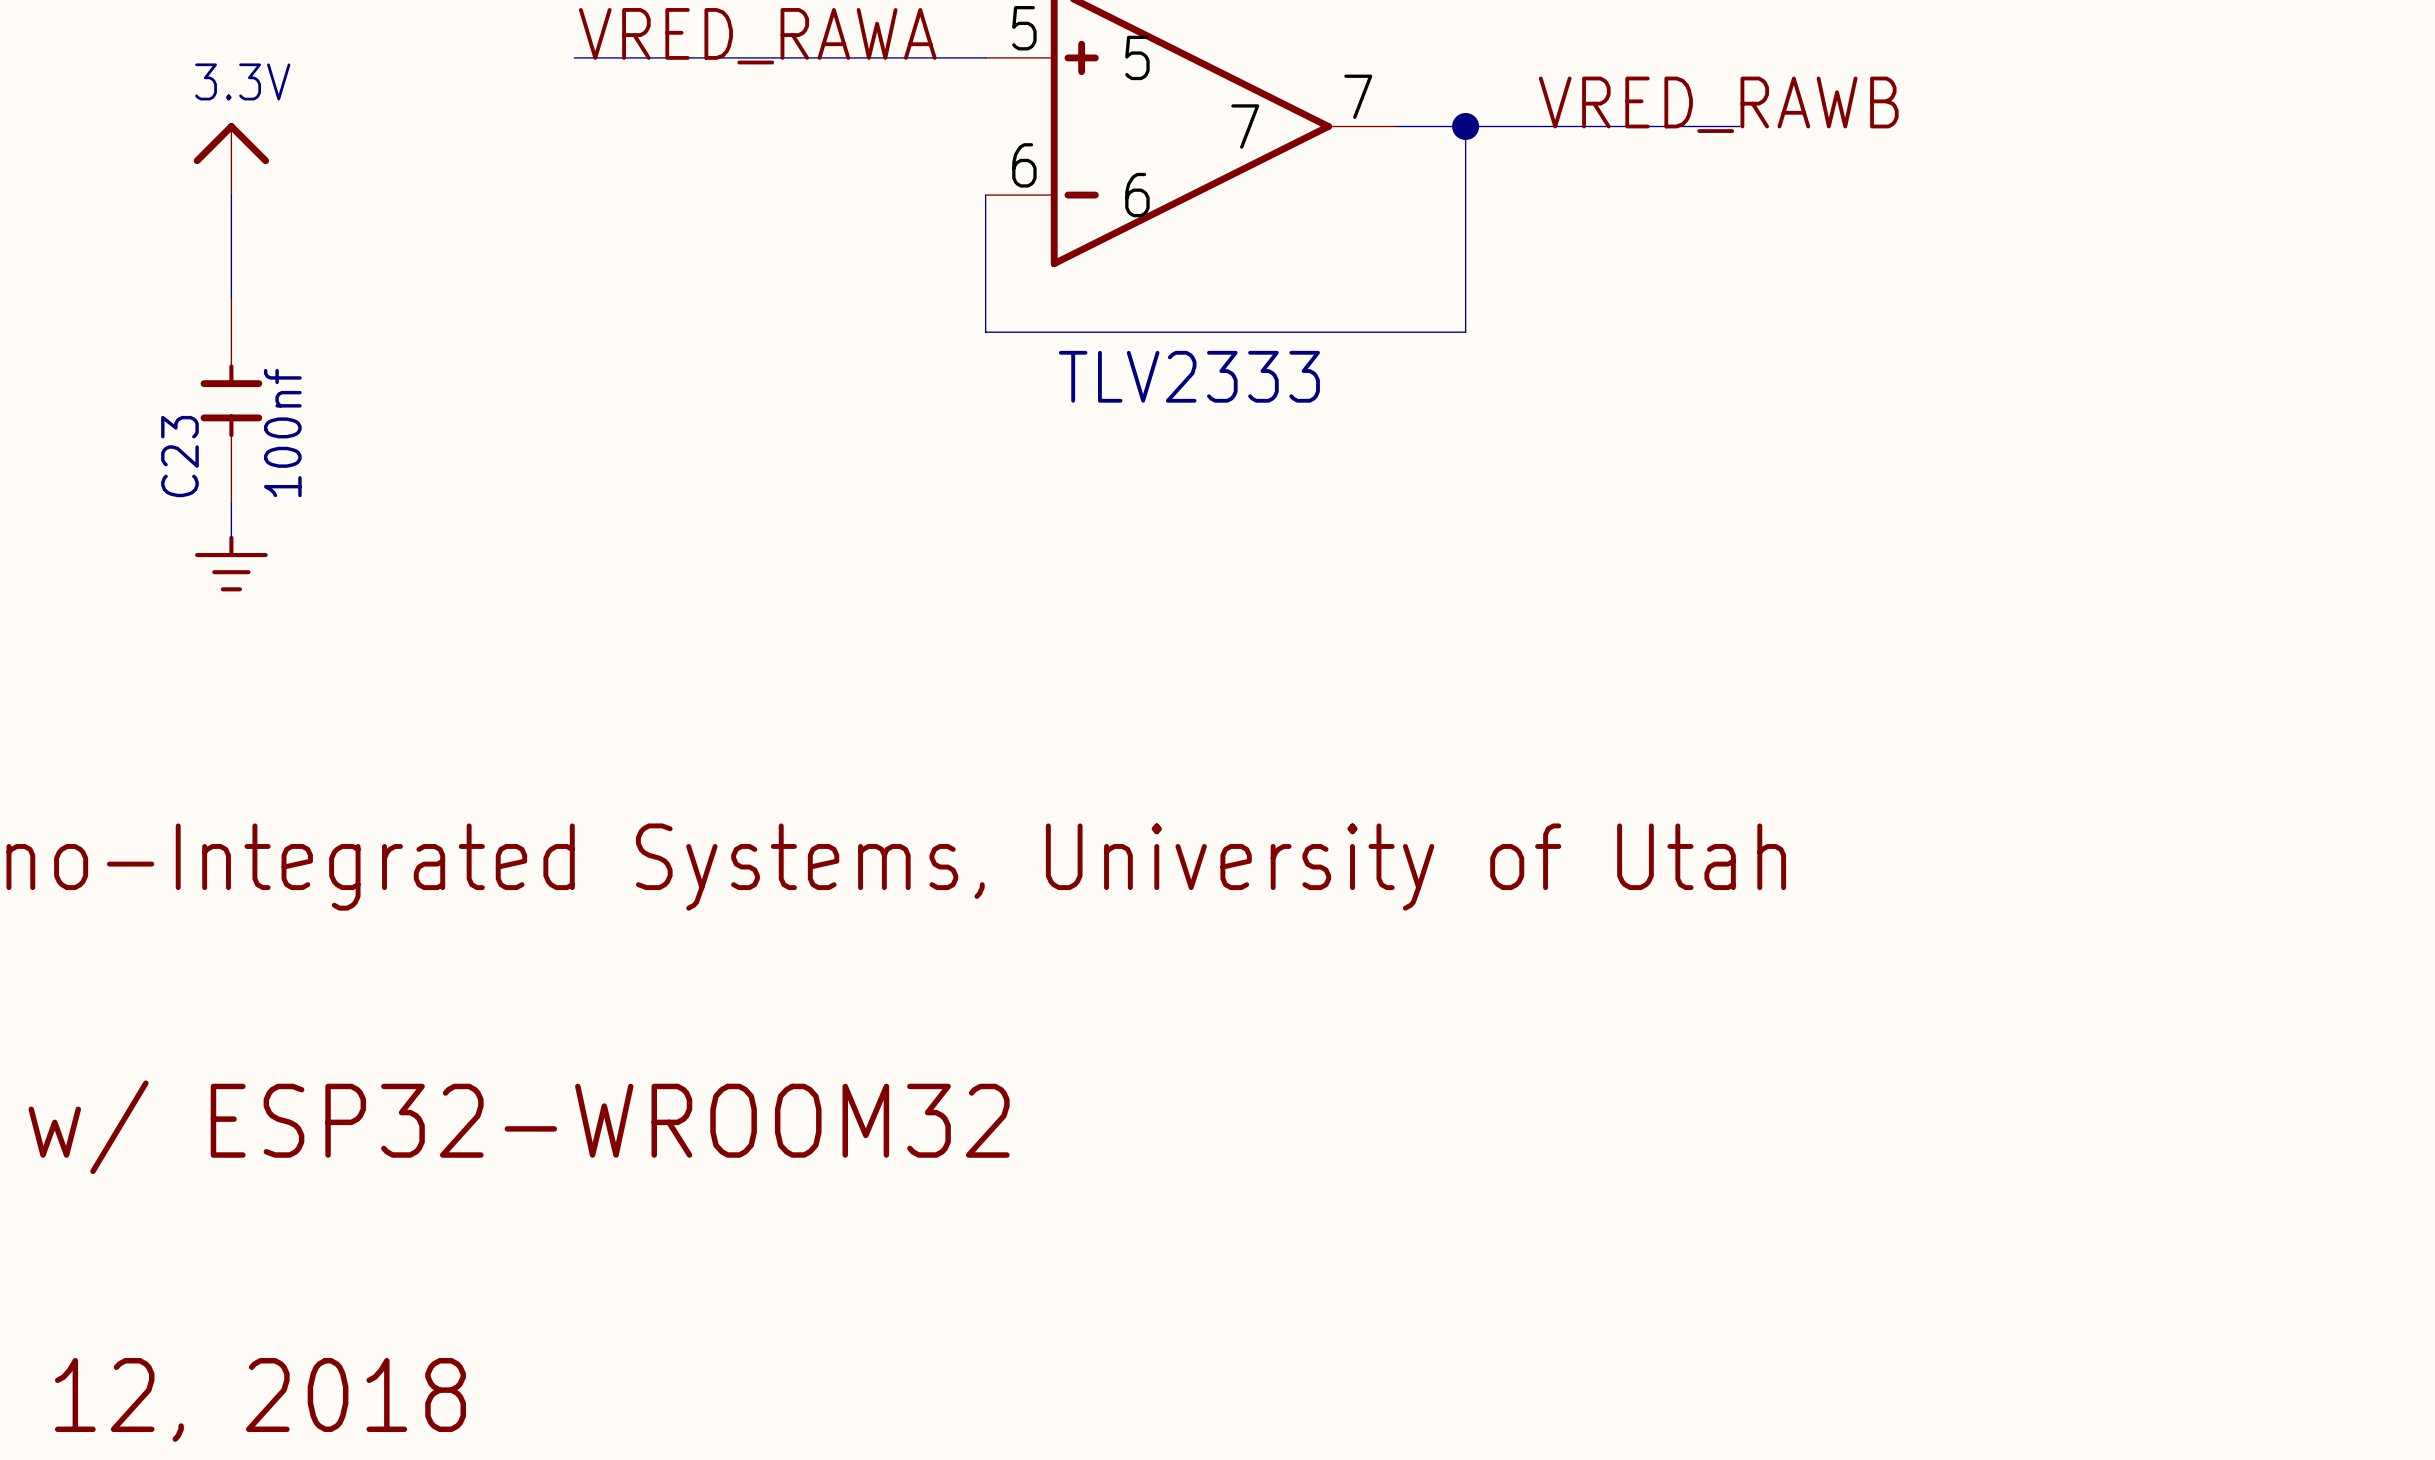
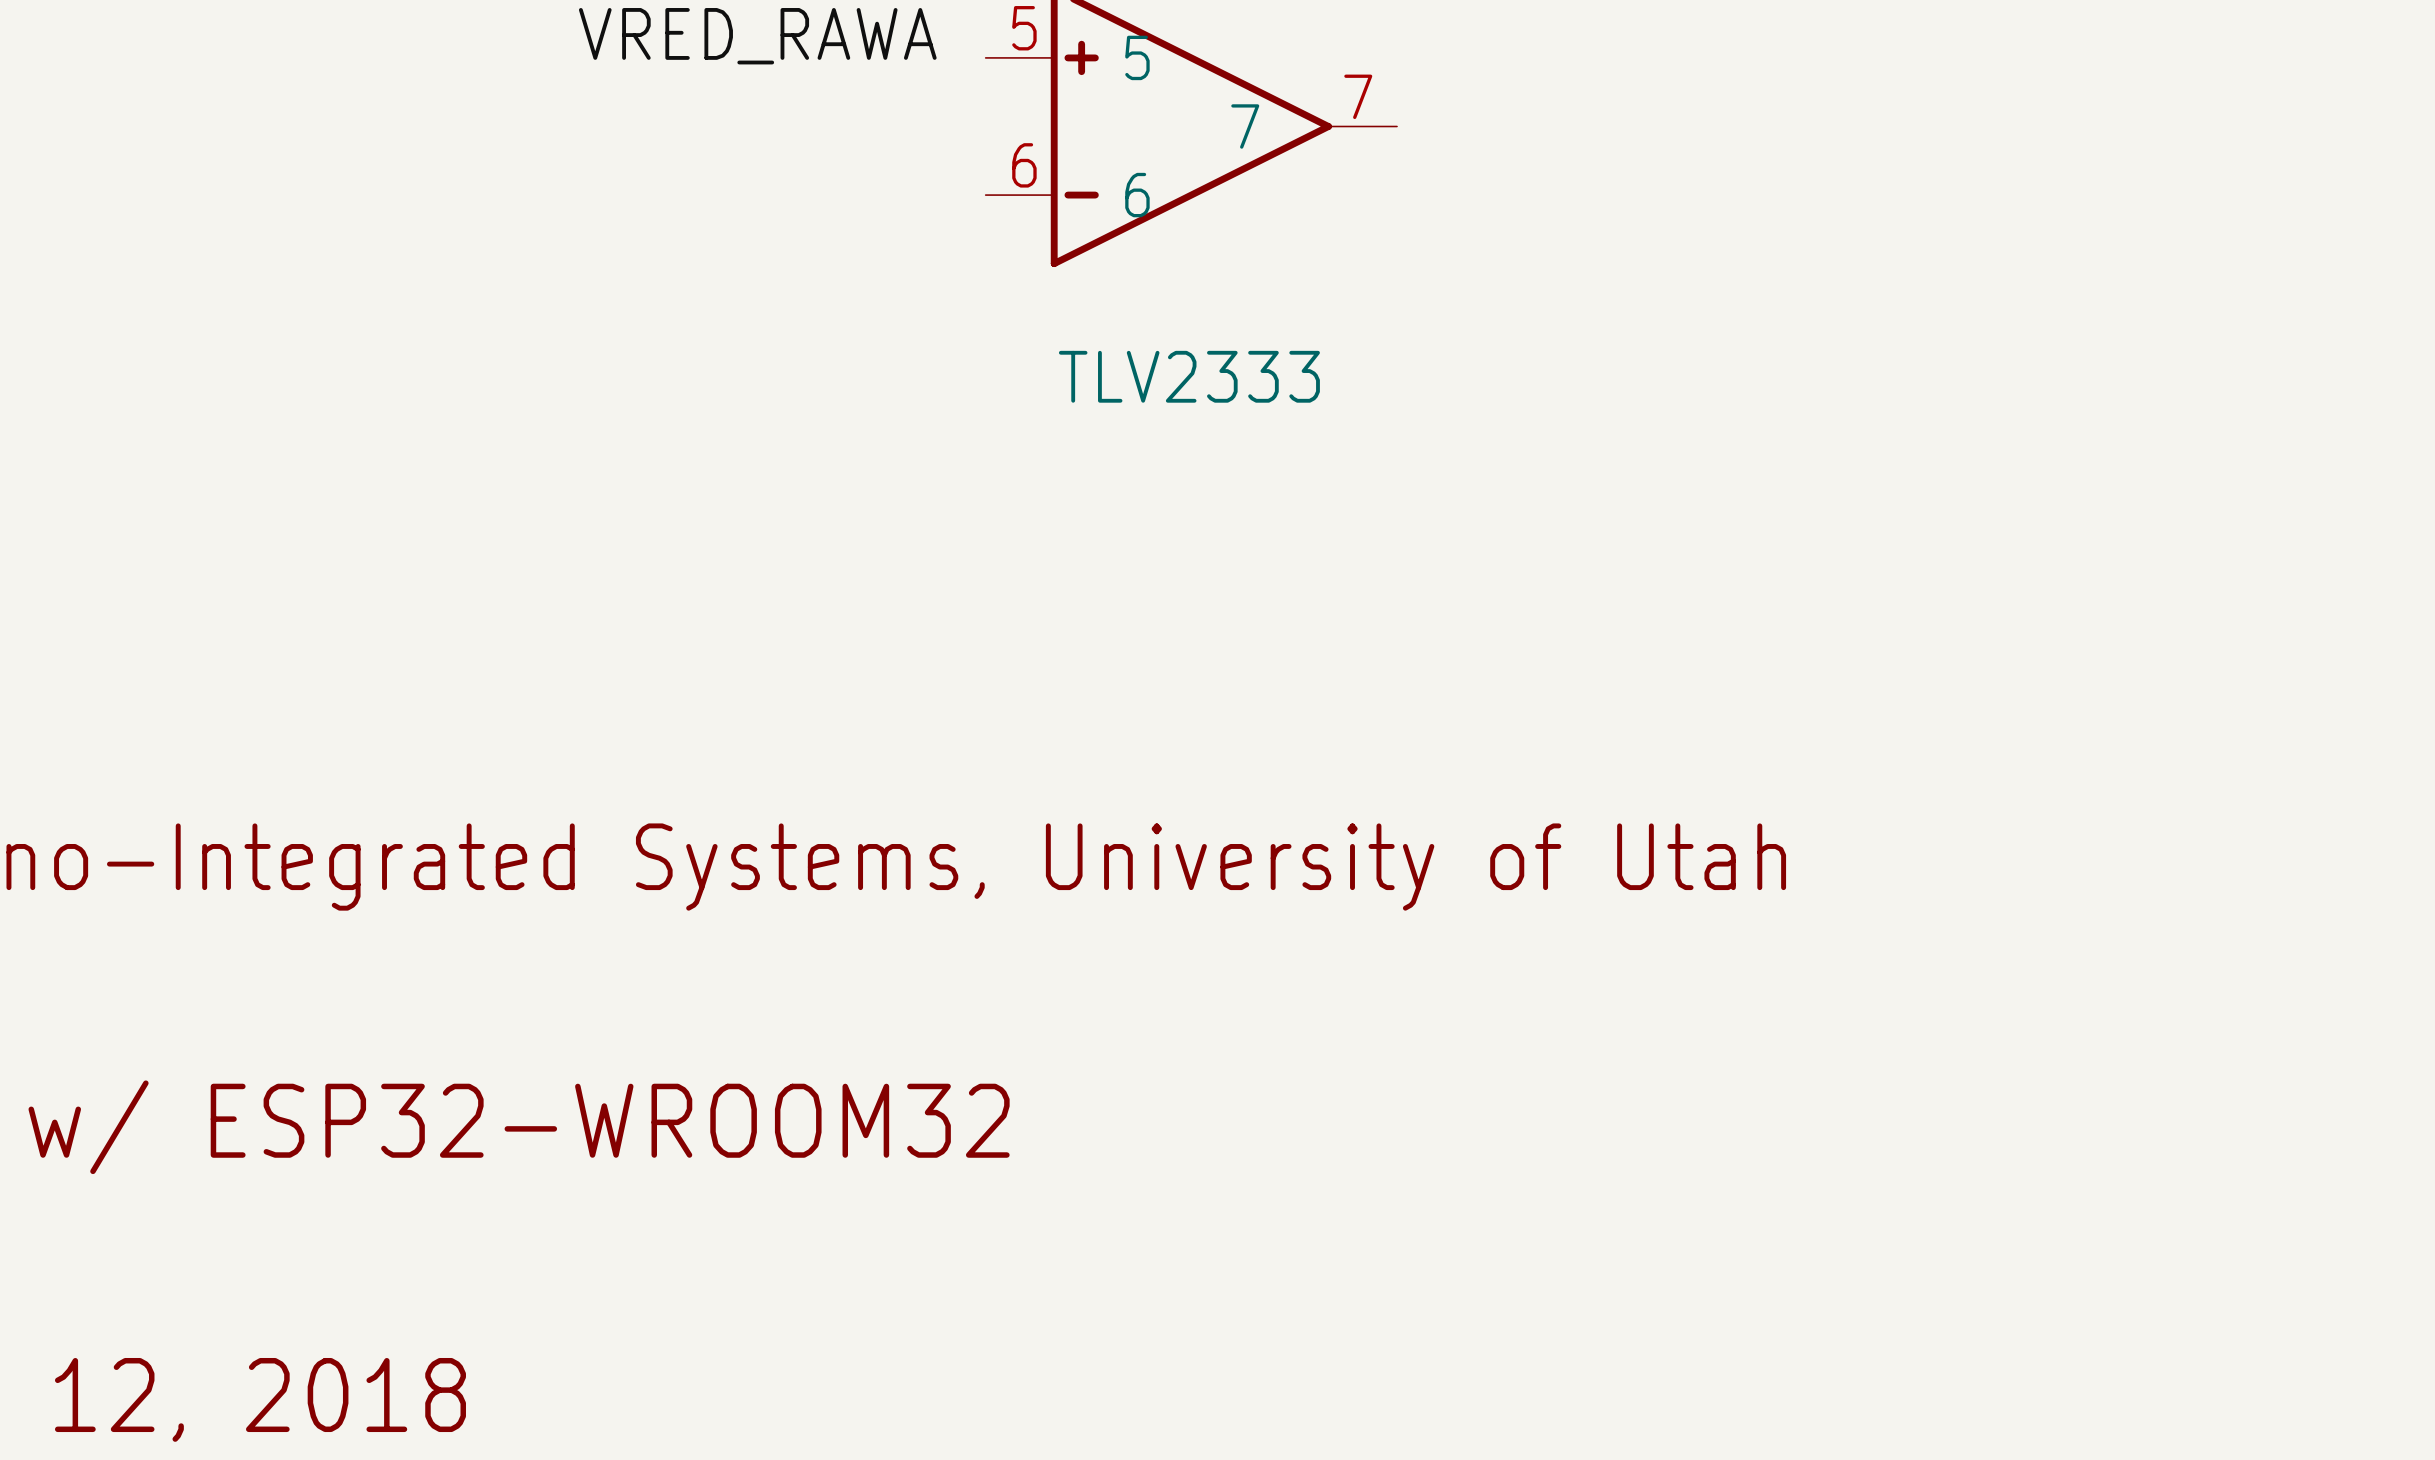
wire: (574, 57) (985, 57) -> none
label: VRED_RAWB (1718, 104) -> none
wire: (1397, 126) (1739, 126) -> none
wire: (1465, 126) (1465, 332) (985, 332) (985, 195) -> none
junction: (1465, 126) -> none
power symbol: 3.3V (231, 159) -> none
wire: (231, 195) (231, 297) -> none
C23: 100nf (231, 400) -> none
wire: (231, 503) (231, 537) -> none
power symbol: (231, 563) -> none

